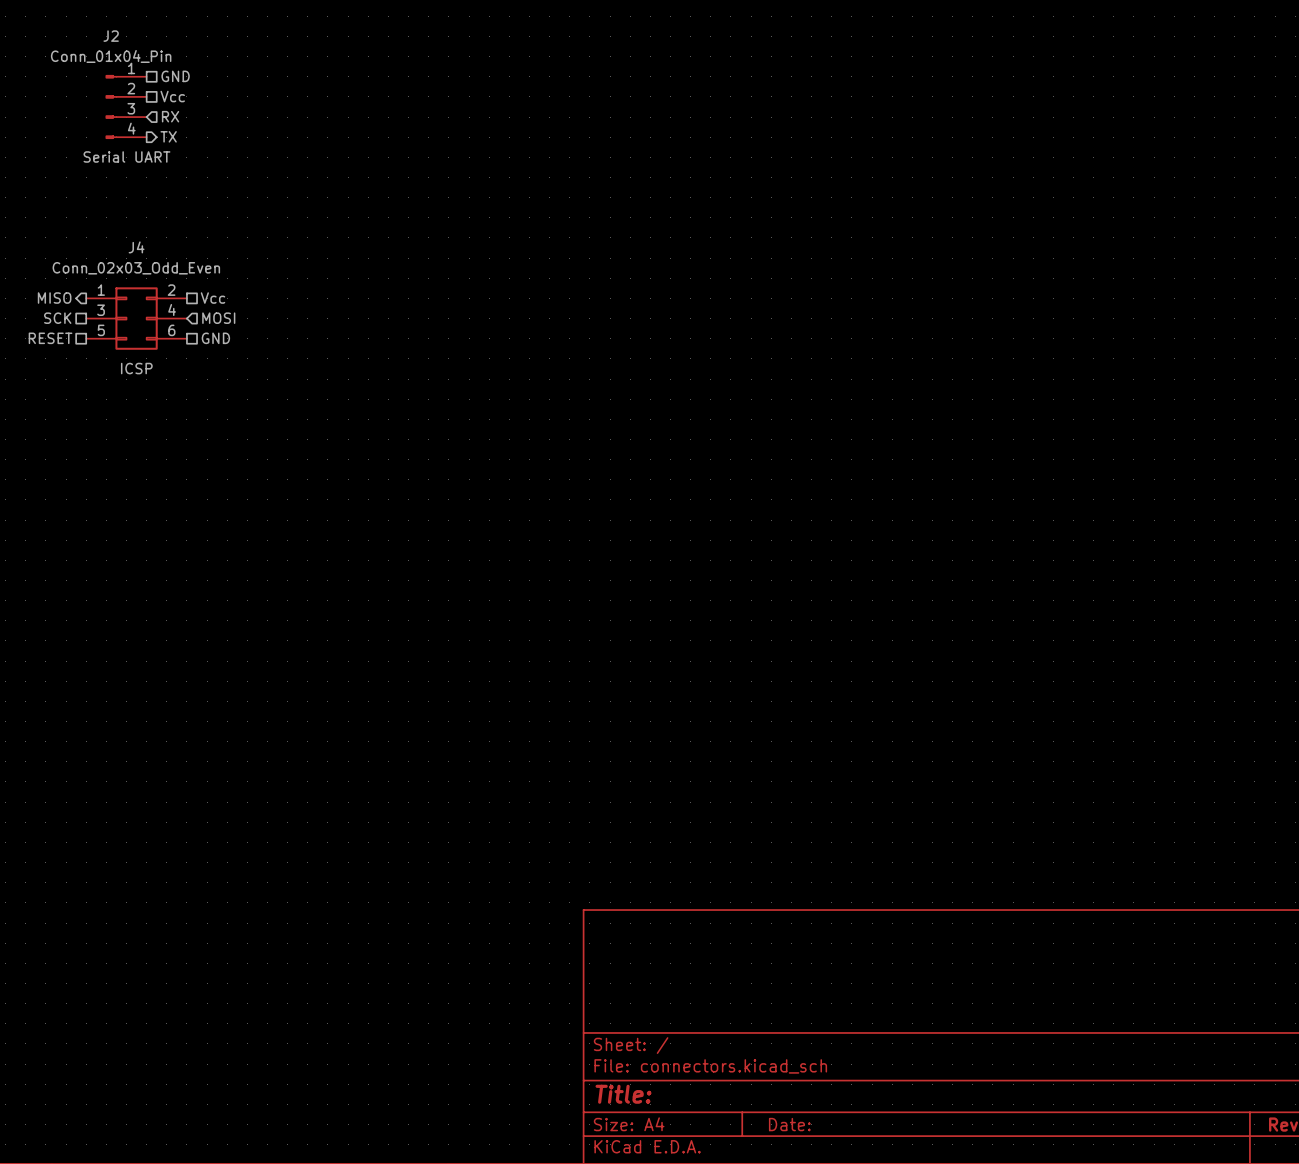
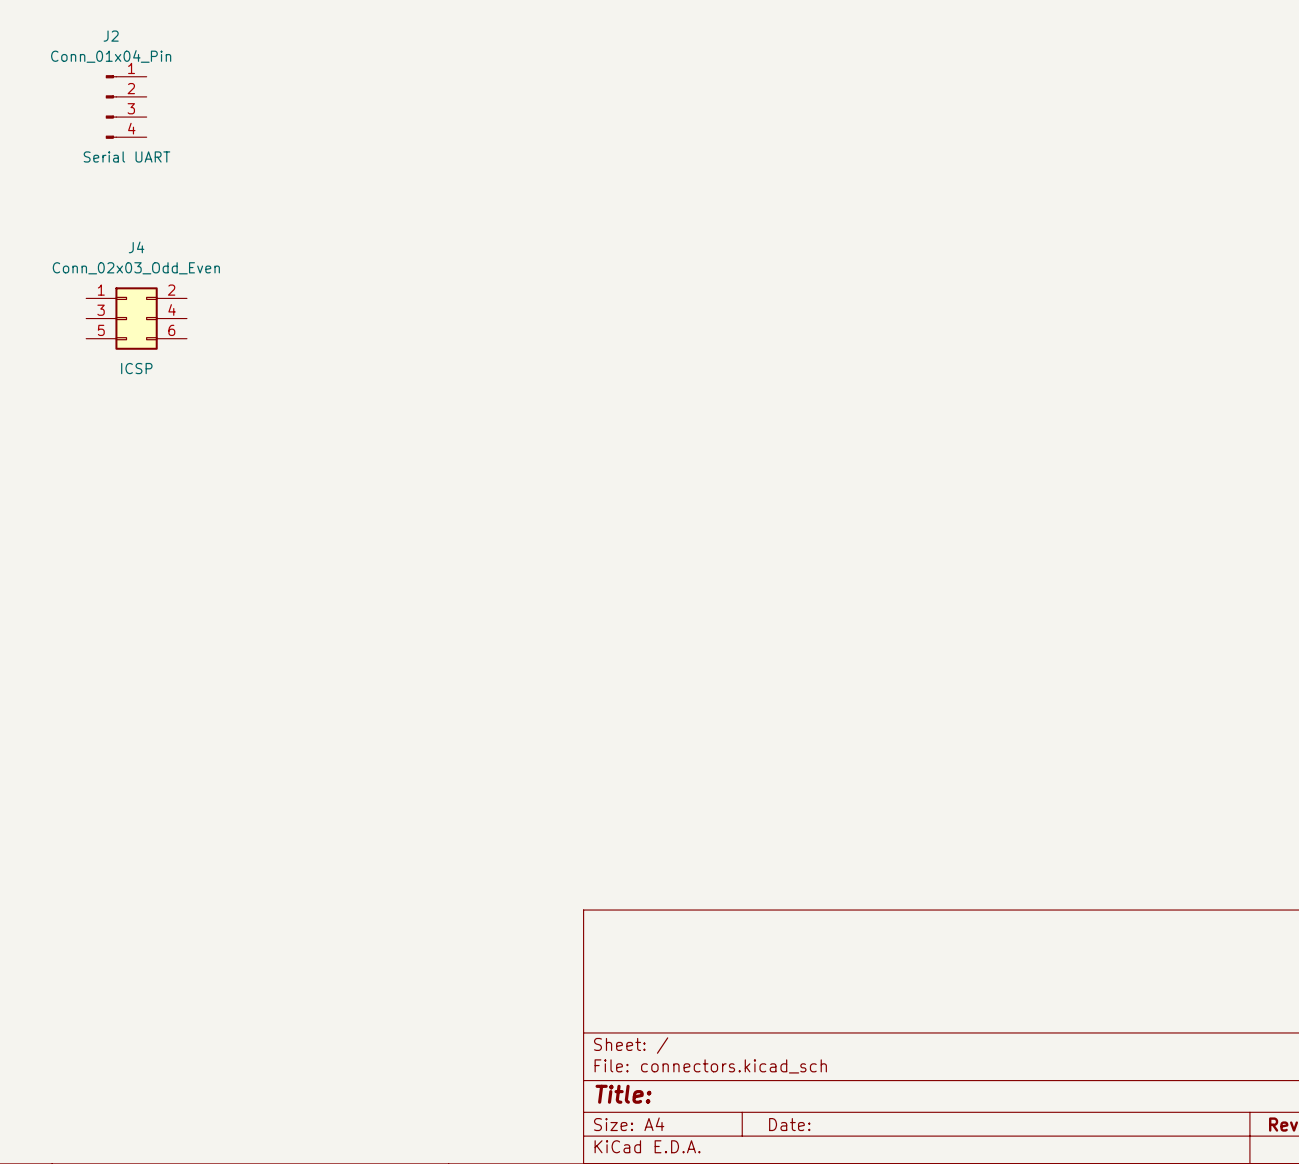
hierarchical label: GND (175, 76) -> none
hierarchical label: Vcc (172, 96) -> none
hierarchical label: RX (170, 116) -> none
hierarchical label: TX (168, 136) -> none
hierarchical label: MISO (54, 298) -> none
hierarchical label: Vcc (213, 298) -> none
hierarchical label: SCK (57, 318) -> none
hierarchical label: MOSI (218, 318) -> none
hierarchical label: RESET (50, 338) -> none
hierarchical label: GND (215, 338) -> none

